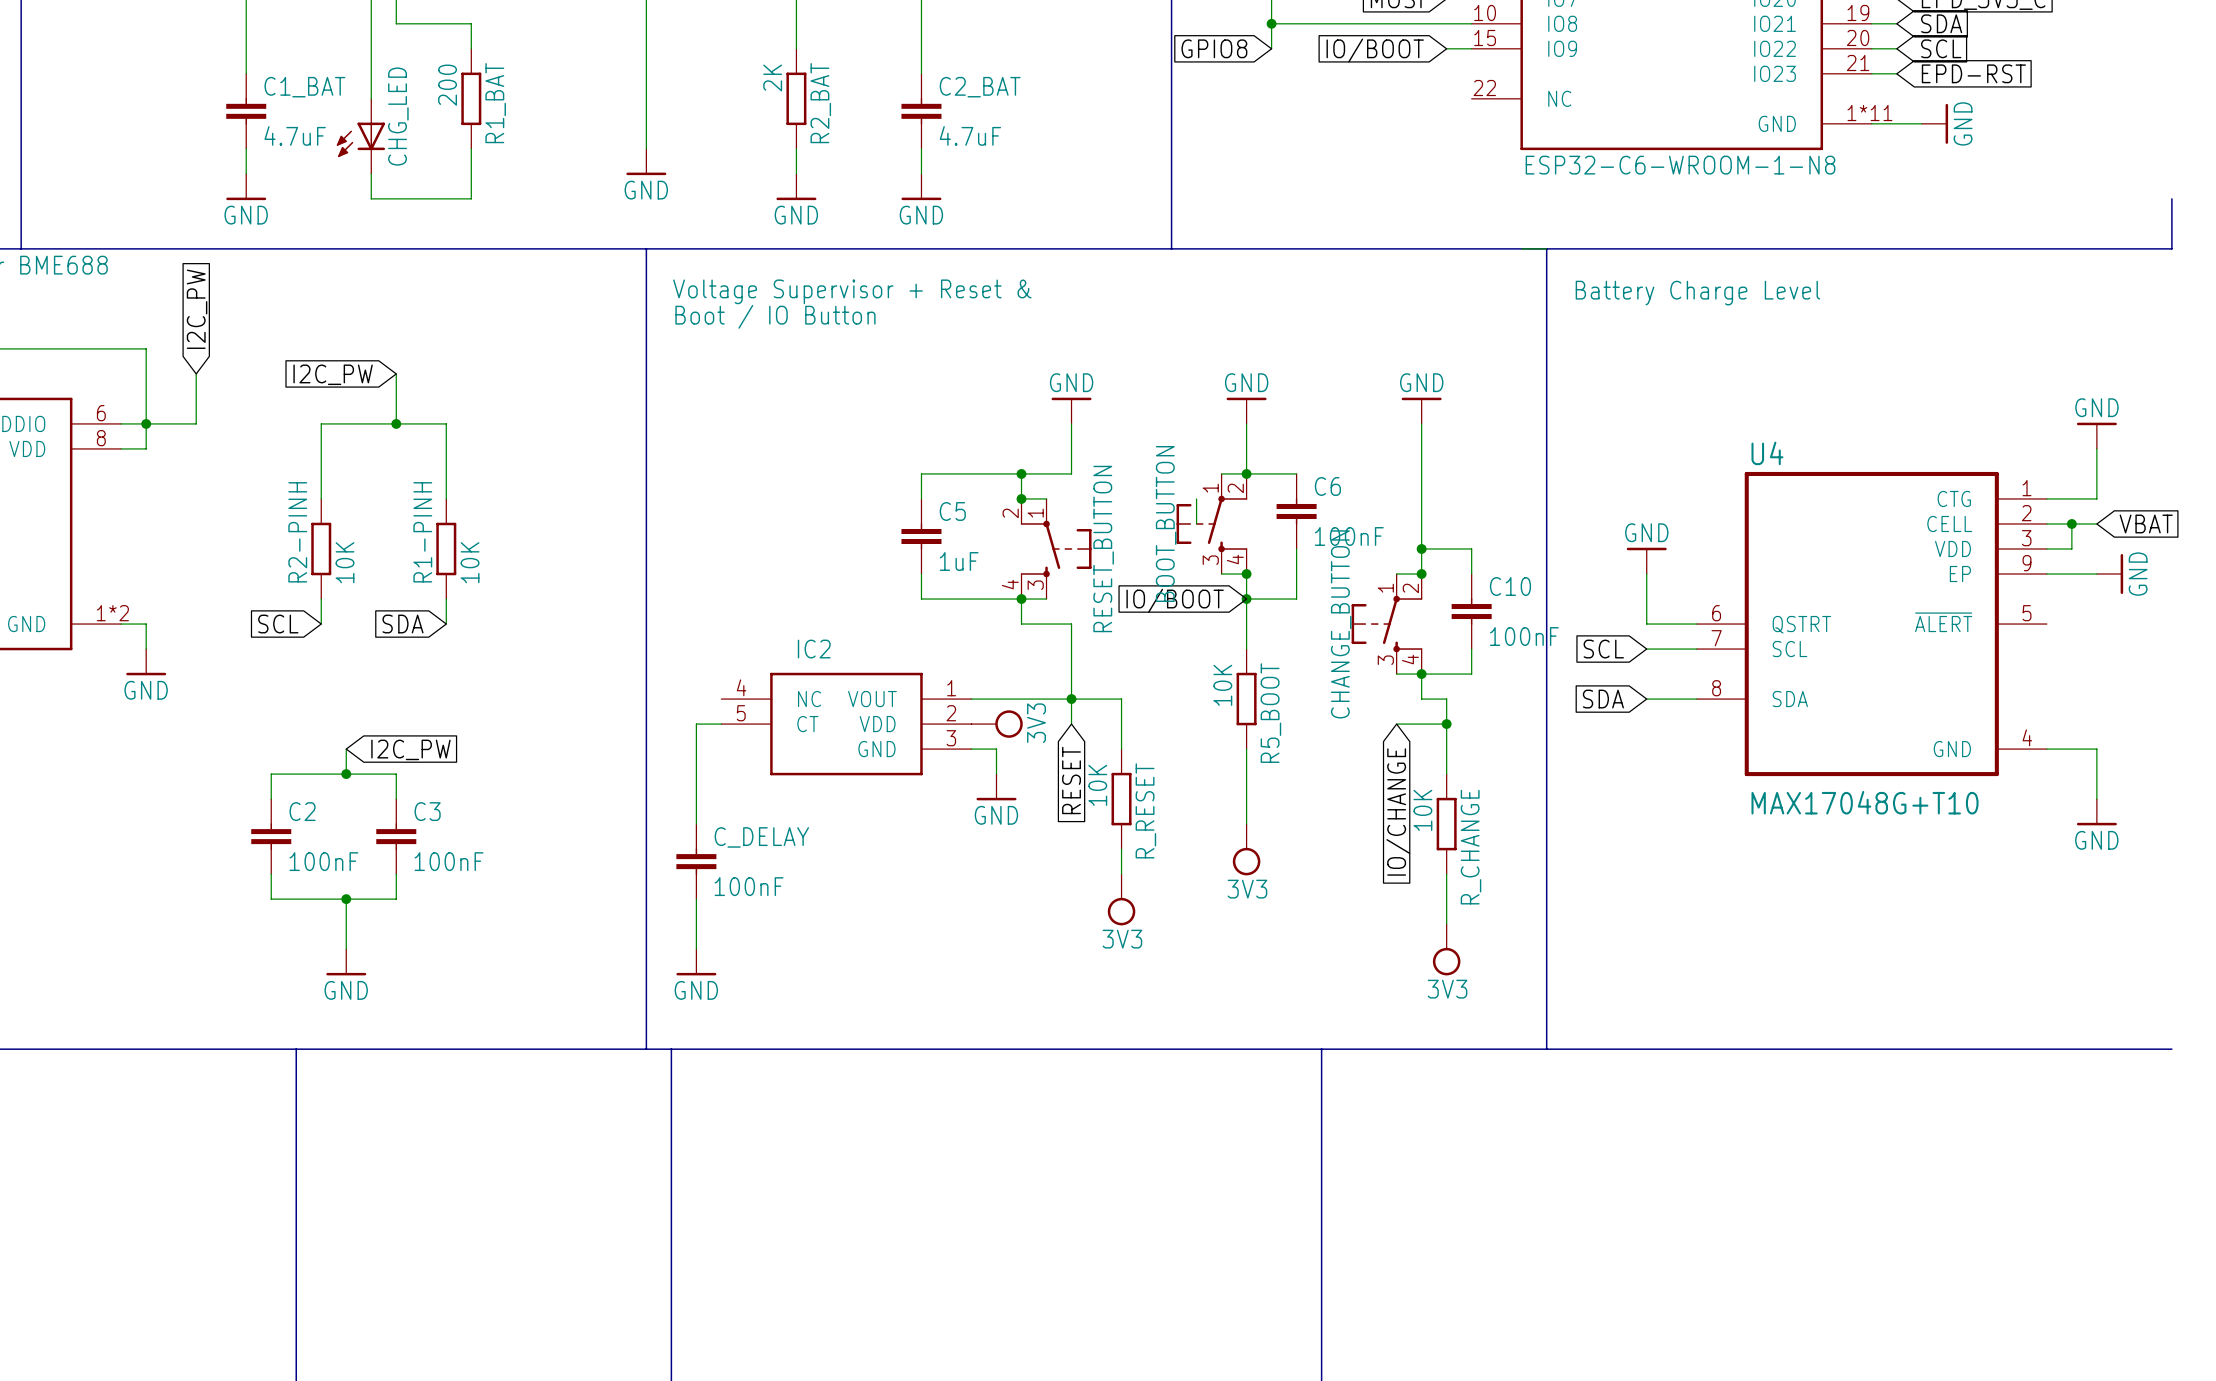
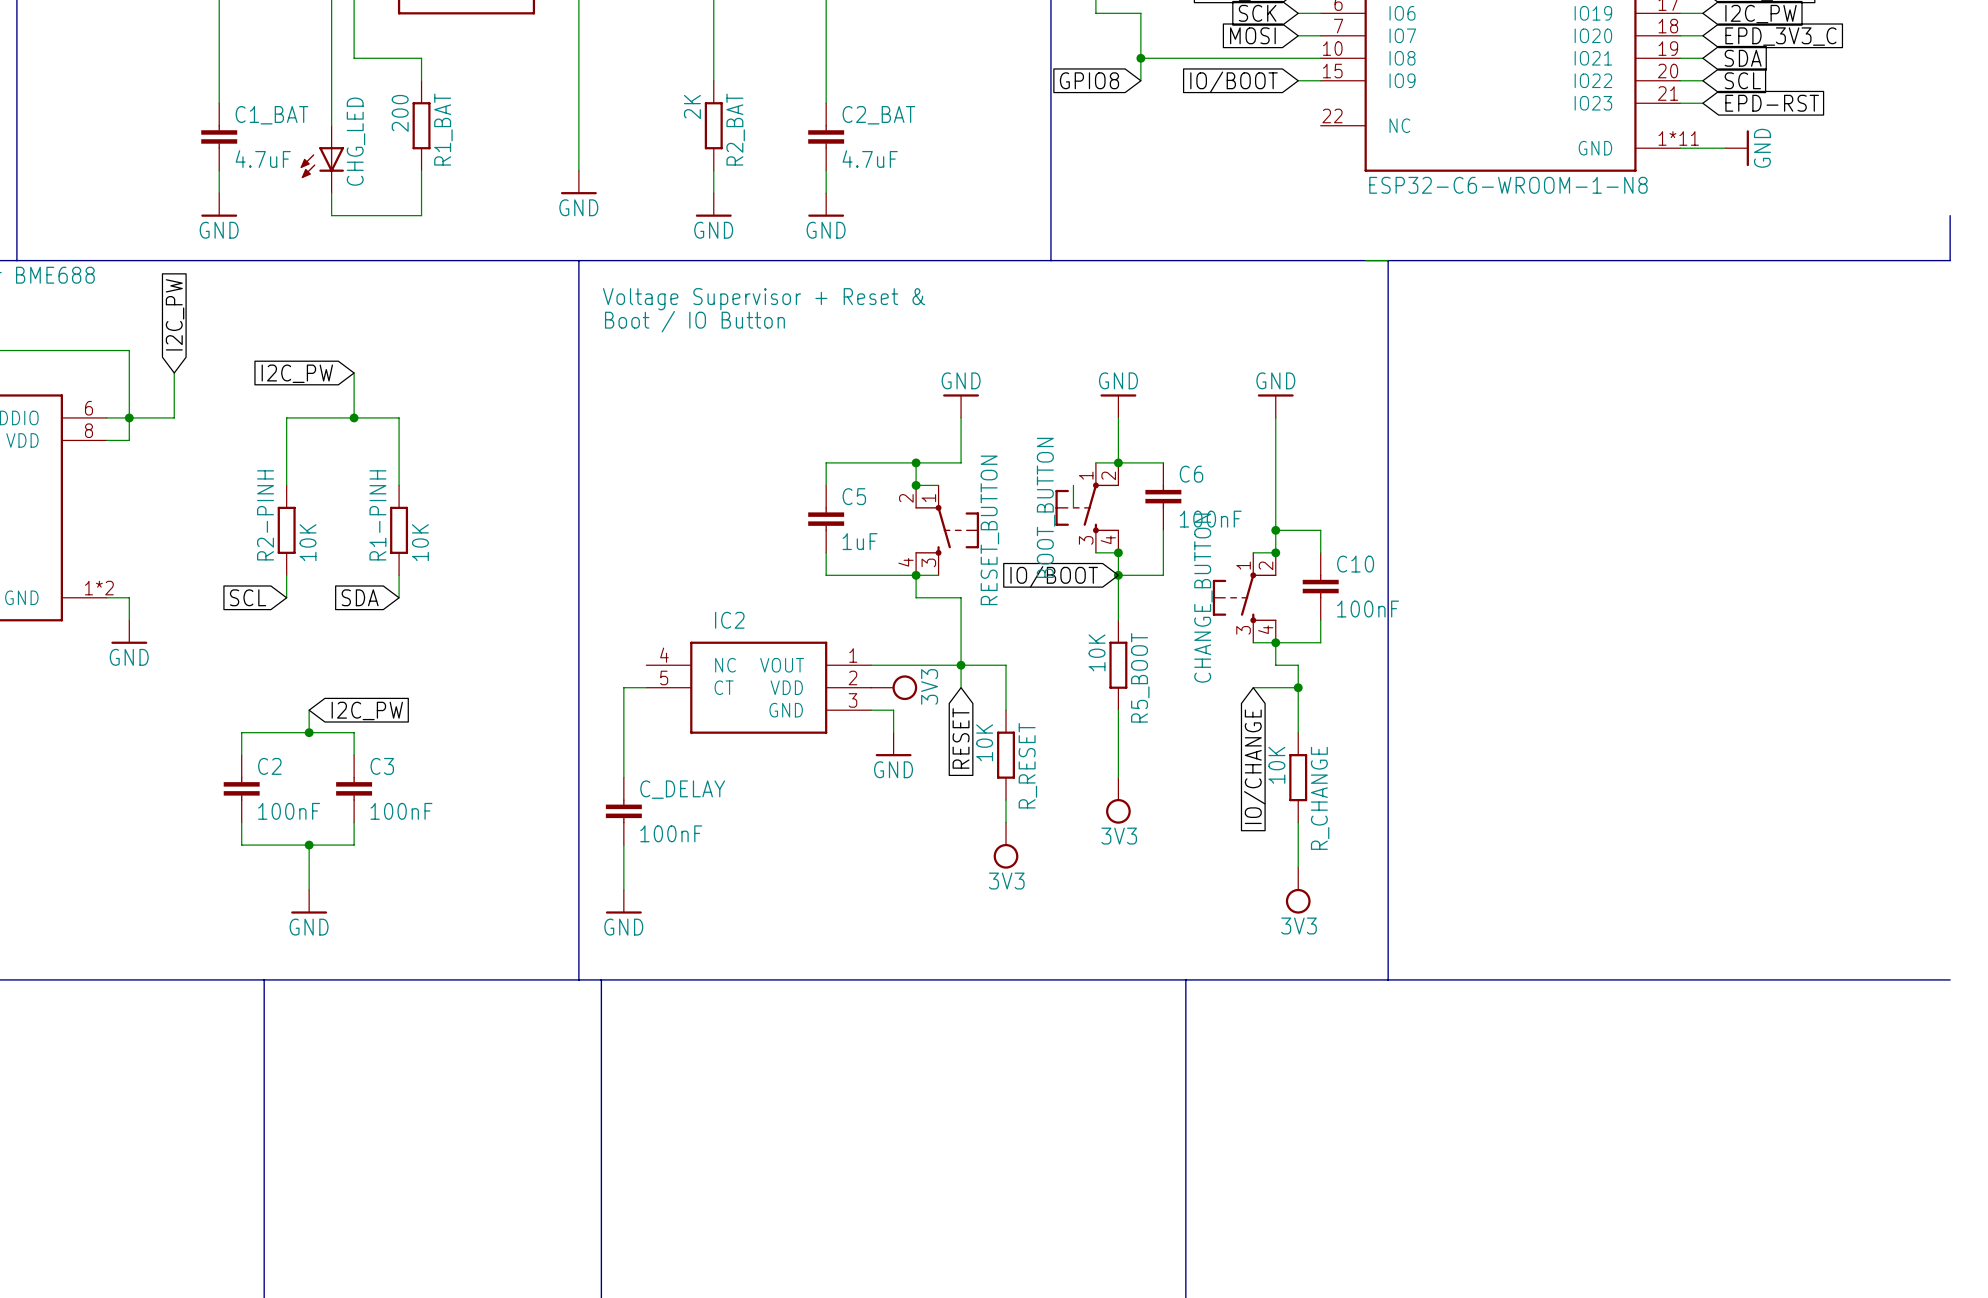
text: Battery Charge Level (1697, 293) -> none
power symbol: GND (2096, 435) -> none
wire: (2096, 448) (2096, 498) (2046, 498) -> none
wire: (2046, 523) (2096, 523) -> none
wire: (2071, 523) (2071, 548) (2046, 548) -> none
junction: (2071, 523) -> none
global label: VBAT (2146, 523) -> none
power symbol: GND (1646, 560) -> none
wire: (1646, 574) (1646, 624) (1696, 624) -> none
wire: (2046, 574) (2096, 574) -> none
power symbol: GND (2110, 574) -> none
U4: MAX17048G+T10 (1871, 624) -> none
global label: SCL (1603, 649) -> none
wire: (1646, 649) (1696, 649) -> none
global label: SDA (1603, 699) -> none
wire: (1646, 699) (1696, 699) -> none
wire: (2046, 749) (2096, 749) (2096, 799) -> none
power symbol: GND (2096, 812) -> none

